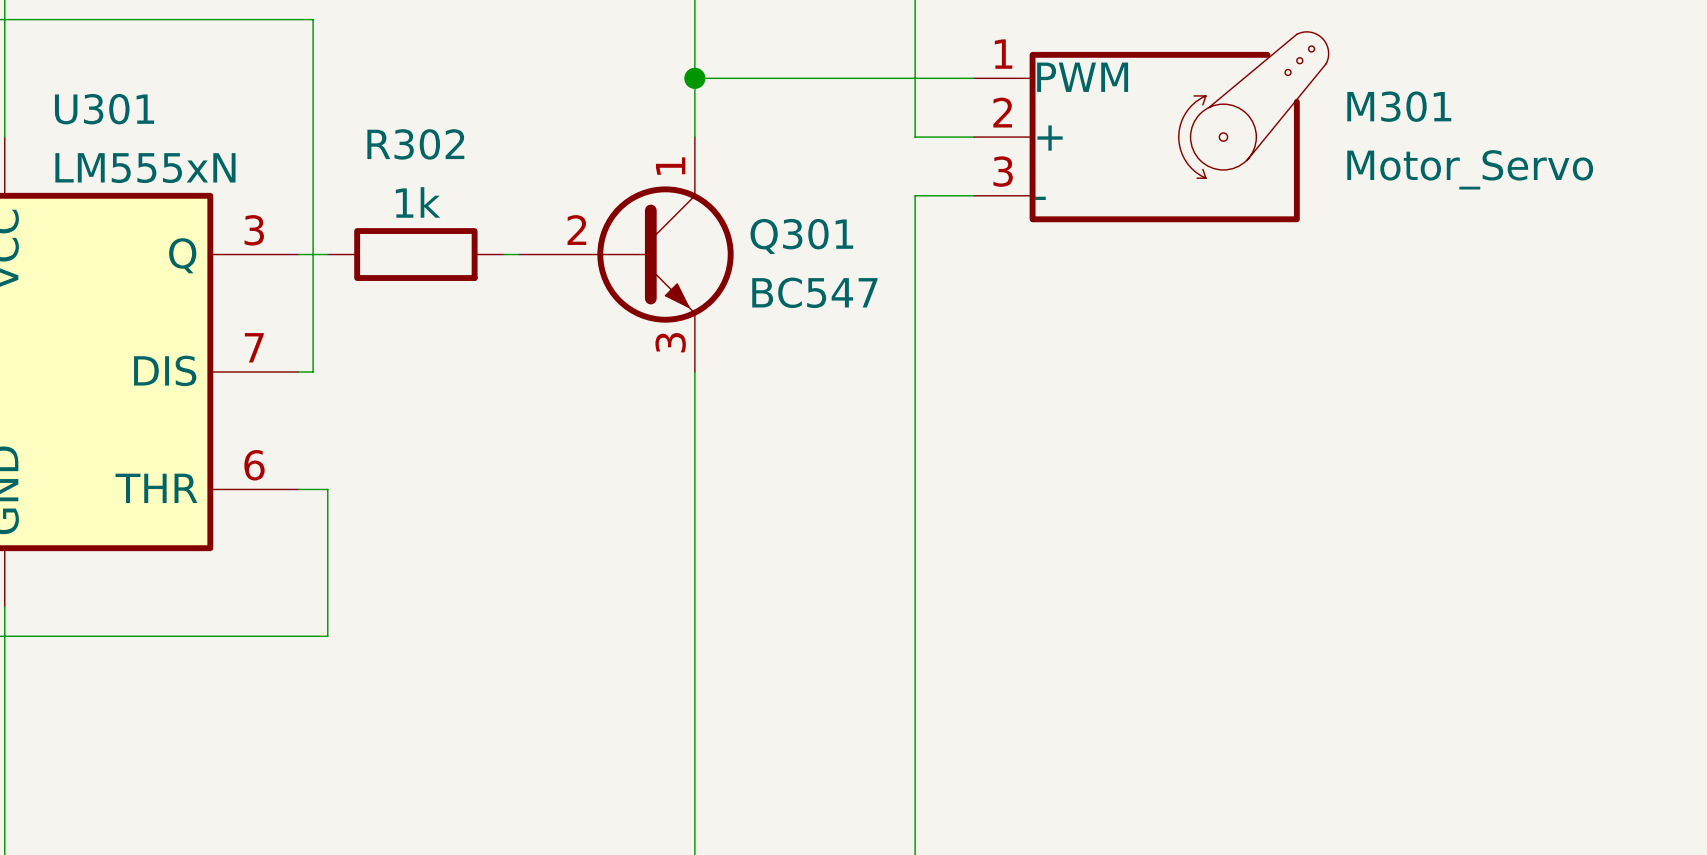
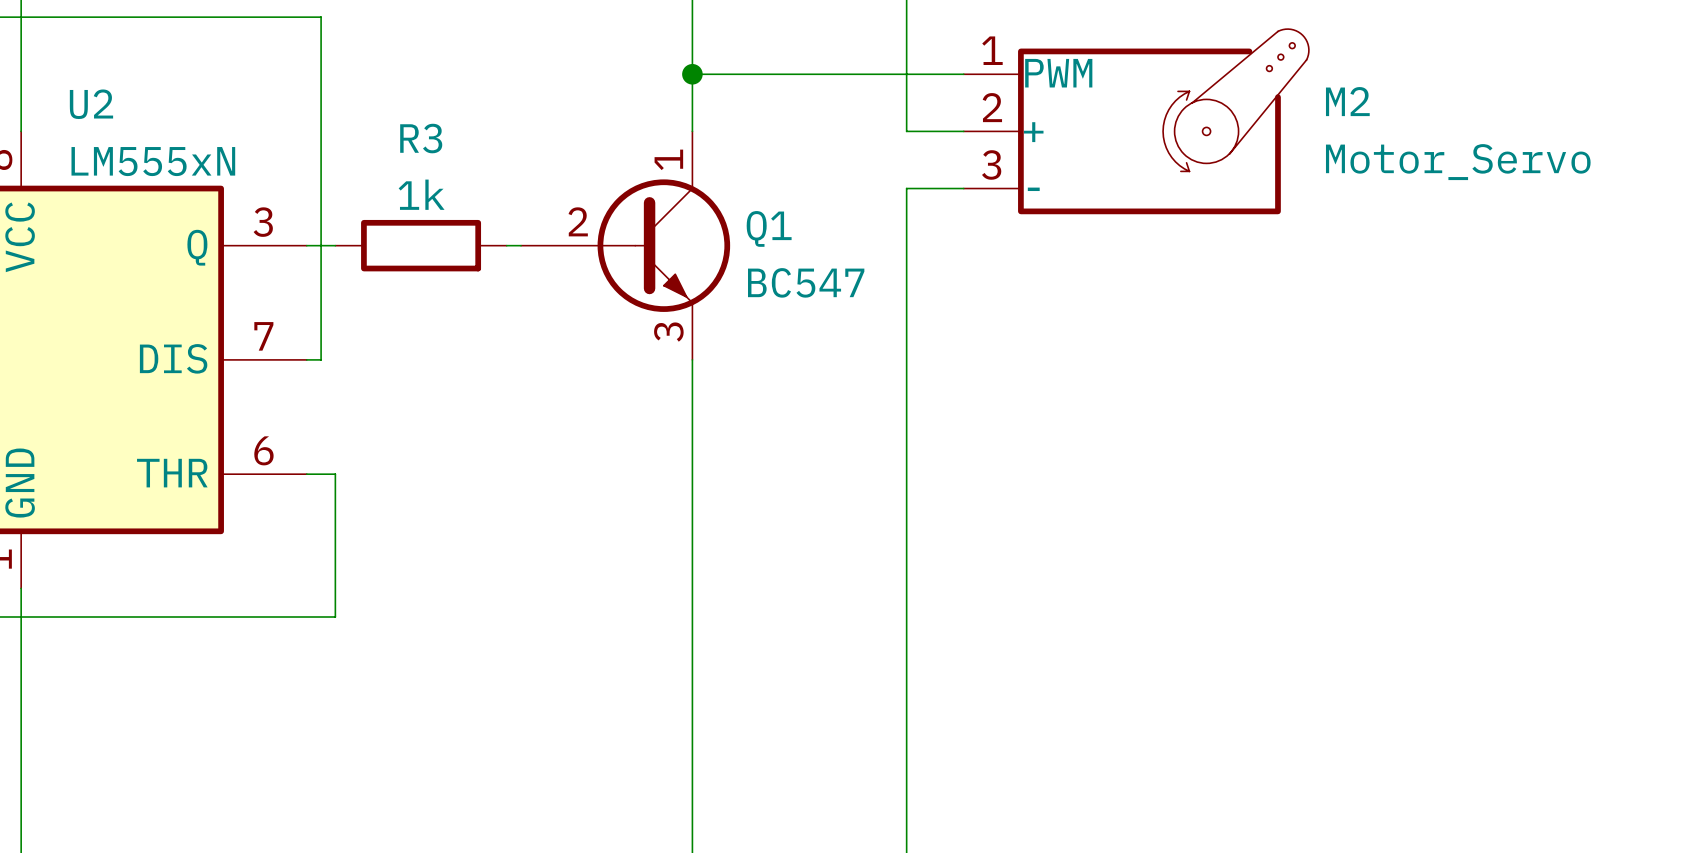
M301 name: M301 (1399, 106) -> M2 (1347, 101)
U301 name: U301 (104, 109) -> U2 (91, 104)
R302 name: R302 (415, 144) -> R3 (421, 138)
Q301 name: Q301 (801, 236) -> Q1 (769, 228)

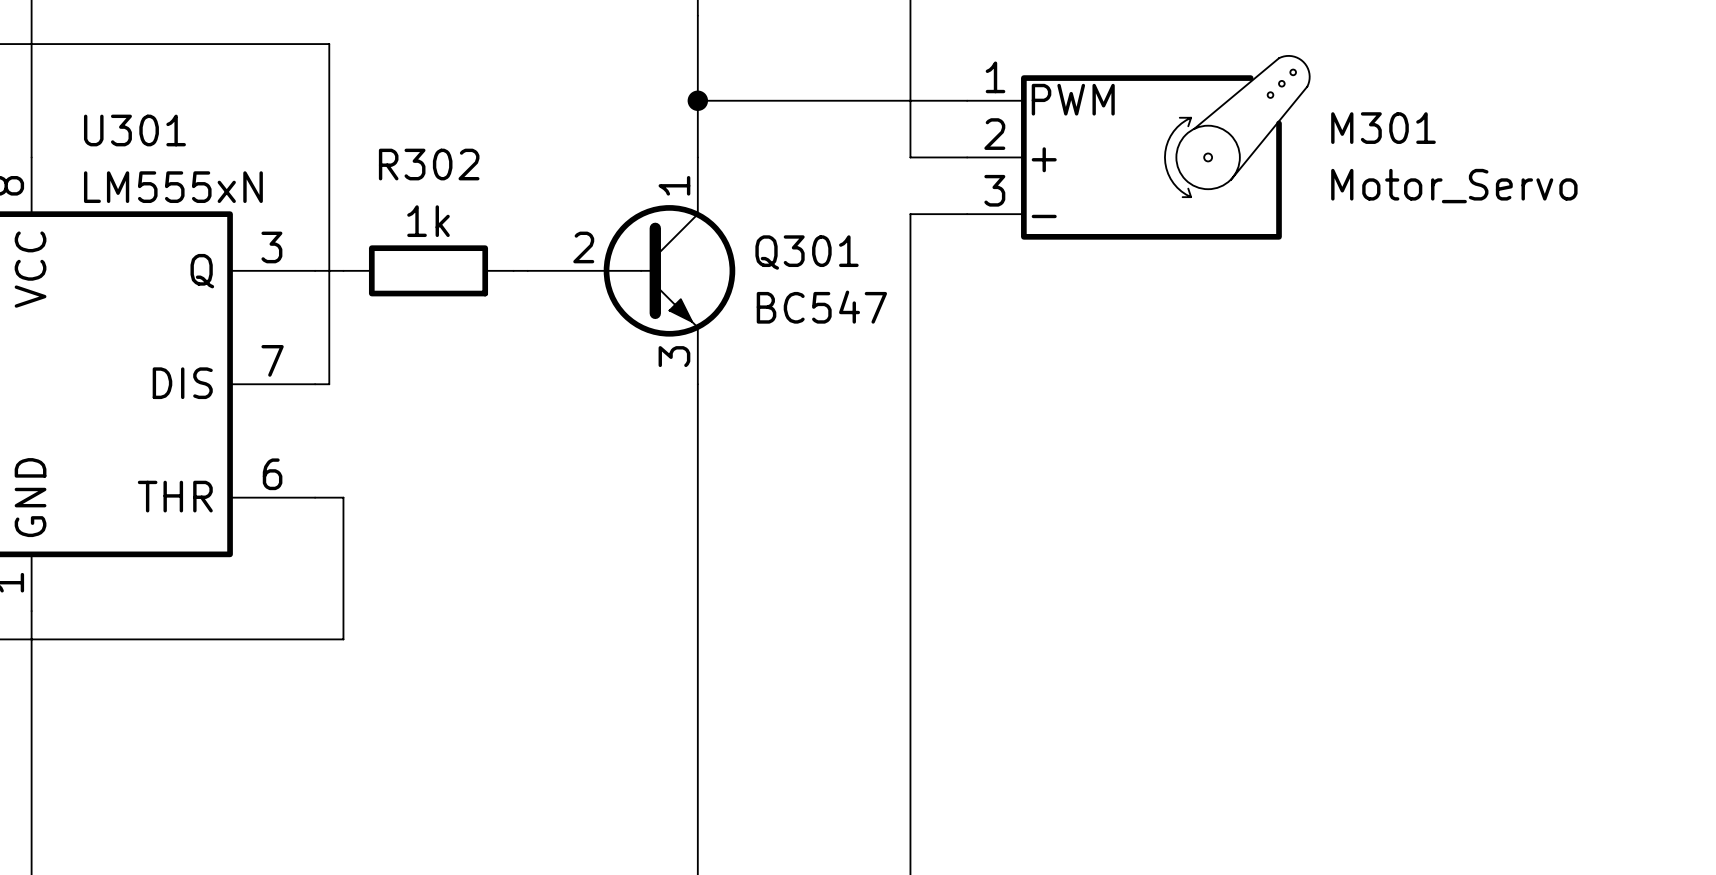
M2 name: M2 (1347, 101) -> M301 (1383, 128)
U2 name: U2 (91, 104) -> U301 (134, 130)
R3 name: R3 (421, 138) -> R302 (429, 164)
Q1 name: Q1 (769, 228) -> Q301 (807, 252)

